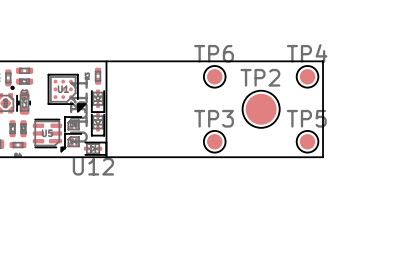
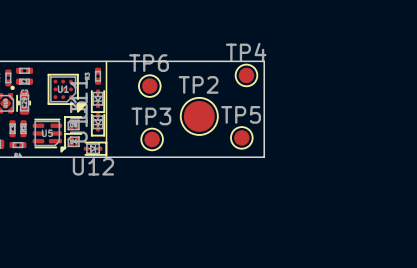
board edge: (264, 61) (323, 61) (323, 157) (264, 157) -> (264, 61) (264, 157)
TP6 position: (214, 76) -> (149, 86)
TP4 position: (307, 76) -> (246, 75)
TP2 position: (261, 109) -> (199, 116)
TP3 position: (214, 141) -> (152, 139)
TP5 position: (307, 141) -> (241, 137)

